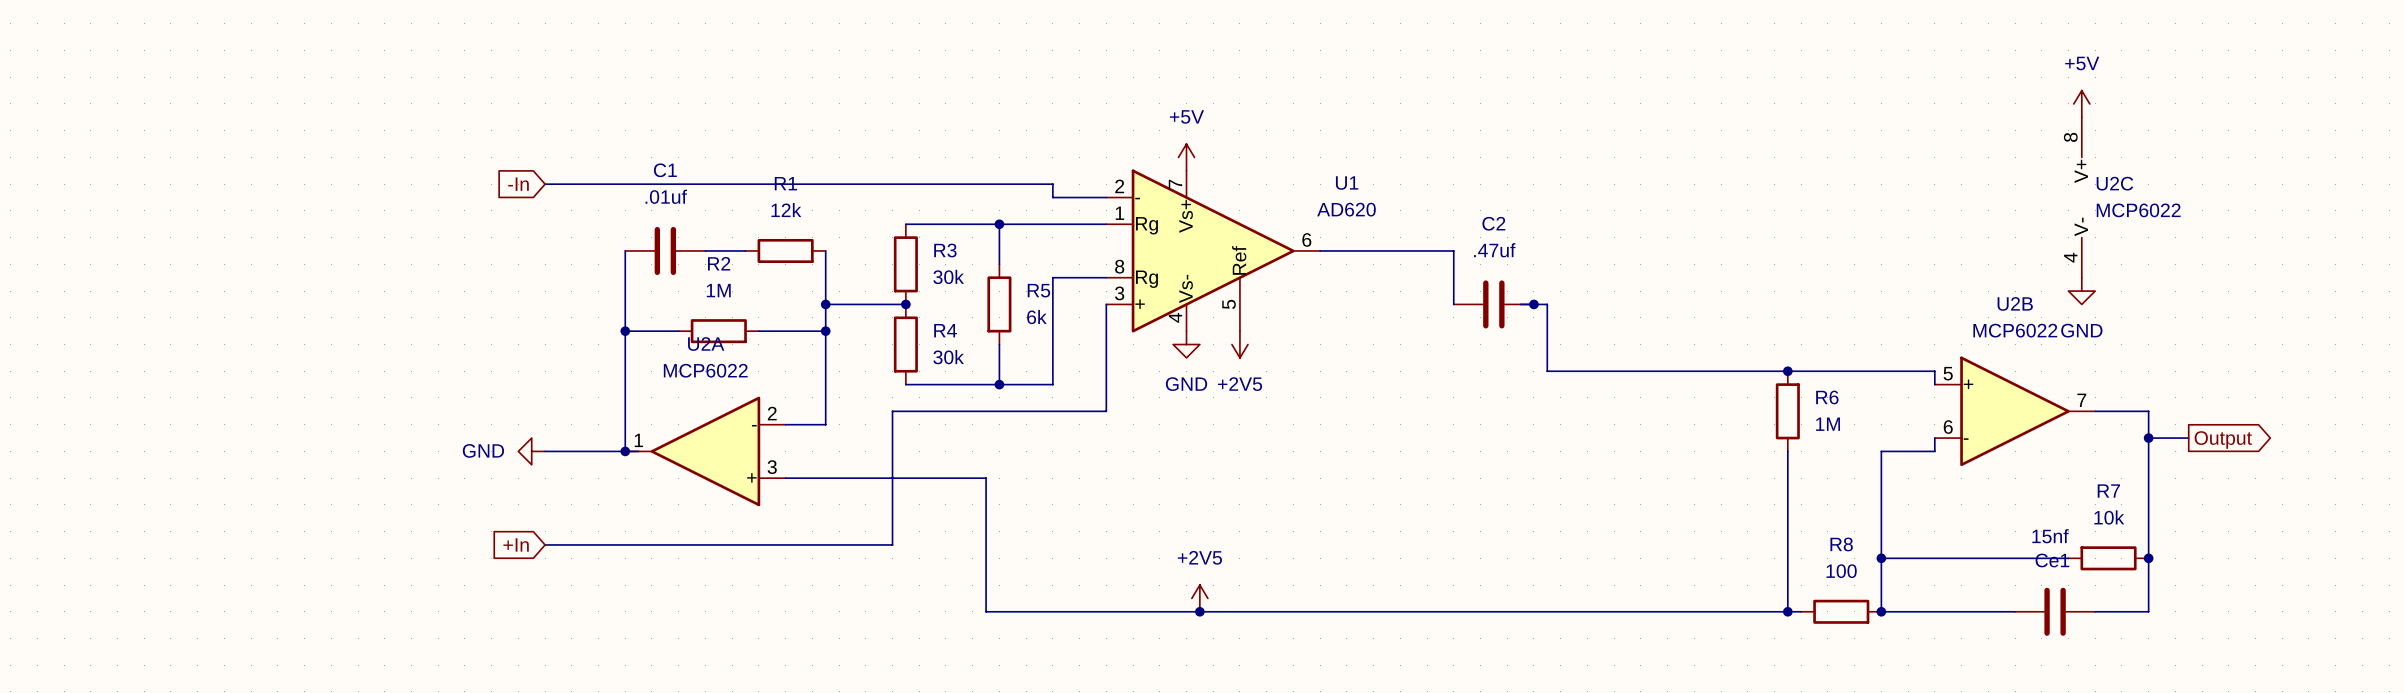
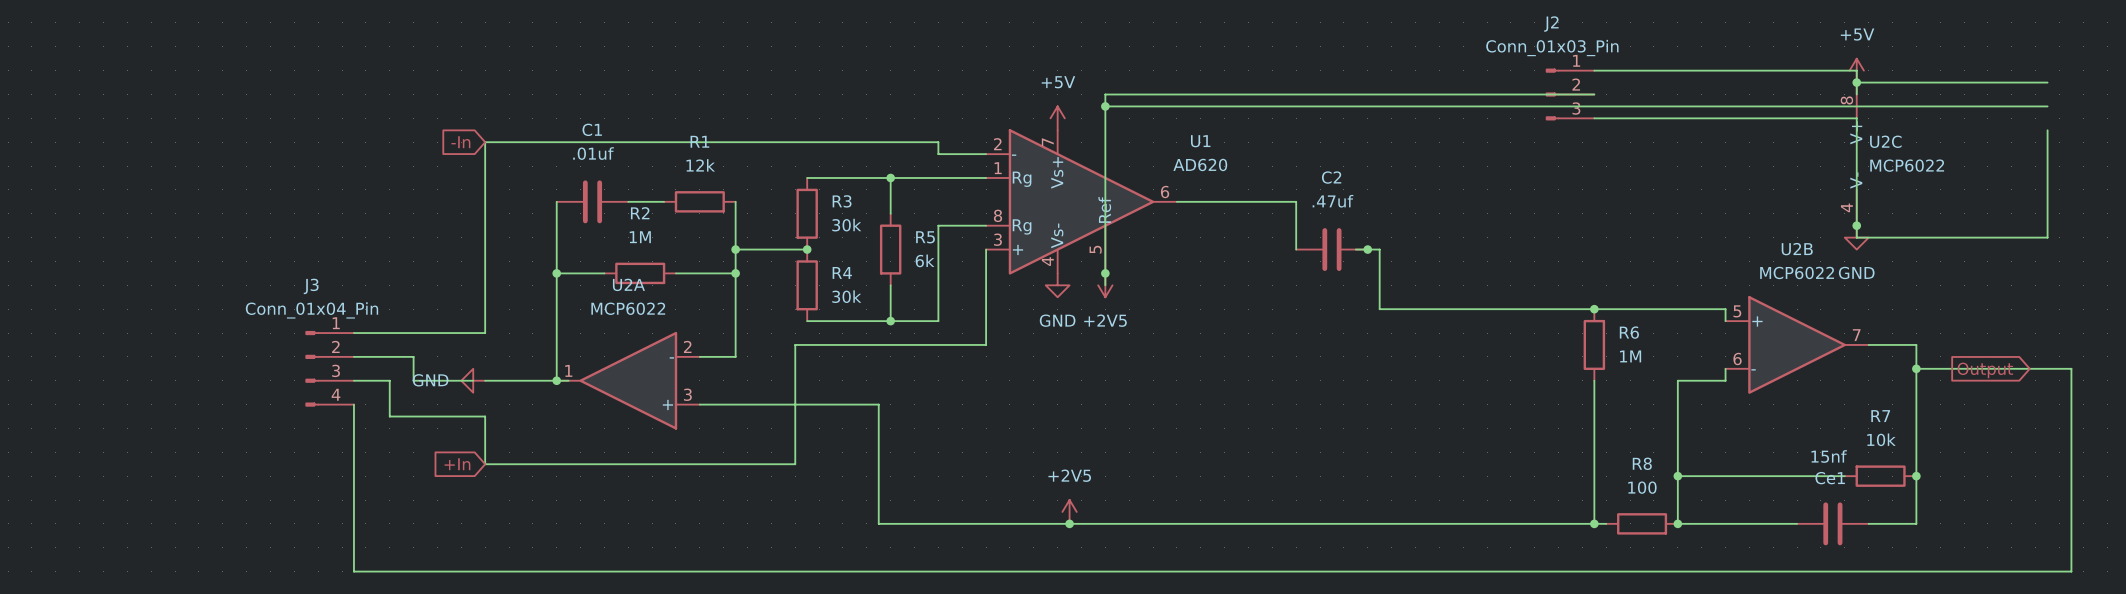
wire: none -> (1594, 70) (1856, 70) (1856, 94)
wire: none -> (1856, 82) (2047, 82)
junction: none -> (1856, 82)
J2: none -> Conn_01x03_Pin (1570, 94)
wire: none -> (1594, 94) (1105, 94) (1105, 285)
wire: none -> (1105, 106) (2047, 106)
junction: none -> (1105, 106)
wire: none -> (1594, 118) (1856, 118) (1856, 237) (2047, 237) (2047, 130)
wire: none -> (485, 142) (485, 333) (353, 333)
junction: none -> (1856, 225)
junction: none -> (1105, 273)
wire: none -> (353, 356) (413, 356) (413, 380) (473, 380)
J3: none -> Conn_01x04_Pin (329, 368)
wire: none -> (1952, 368) (2071, 368) (2071, 571) (353, 571) (353, 404)
wire: none -> (353, 380) (389, 380) (389, 416) (485, 416) (485, 464)

